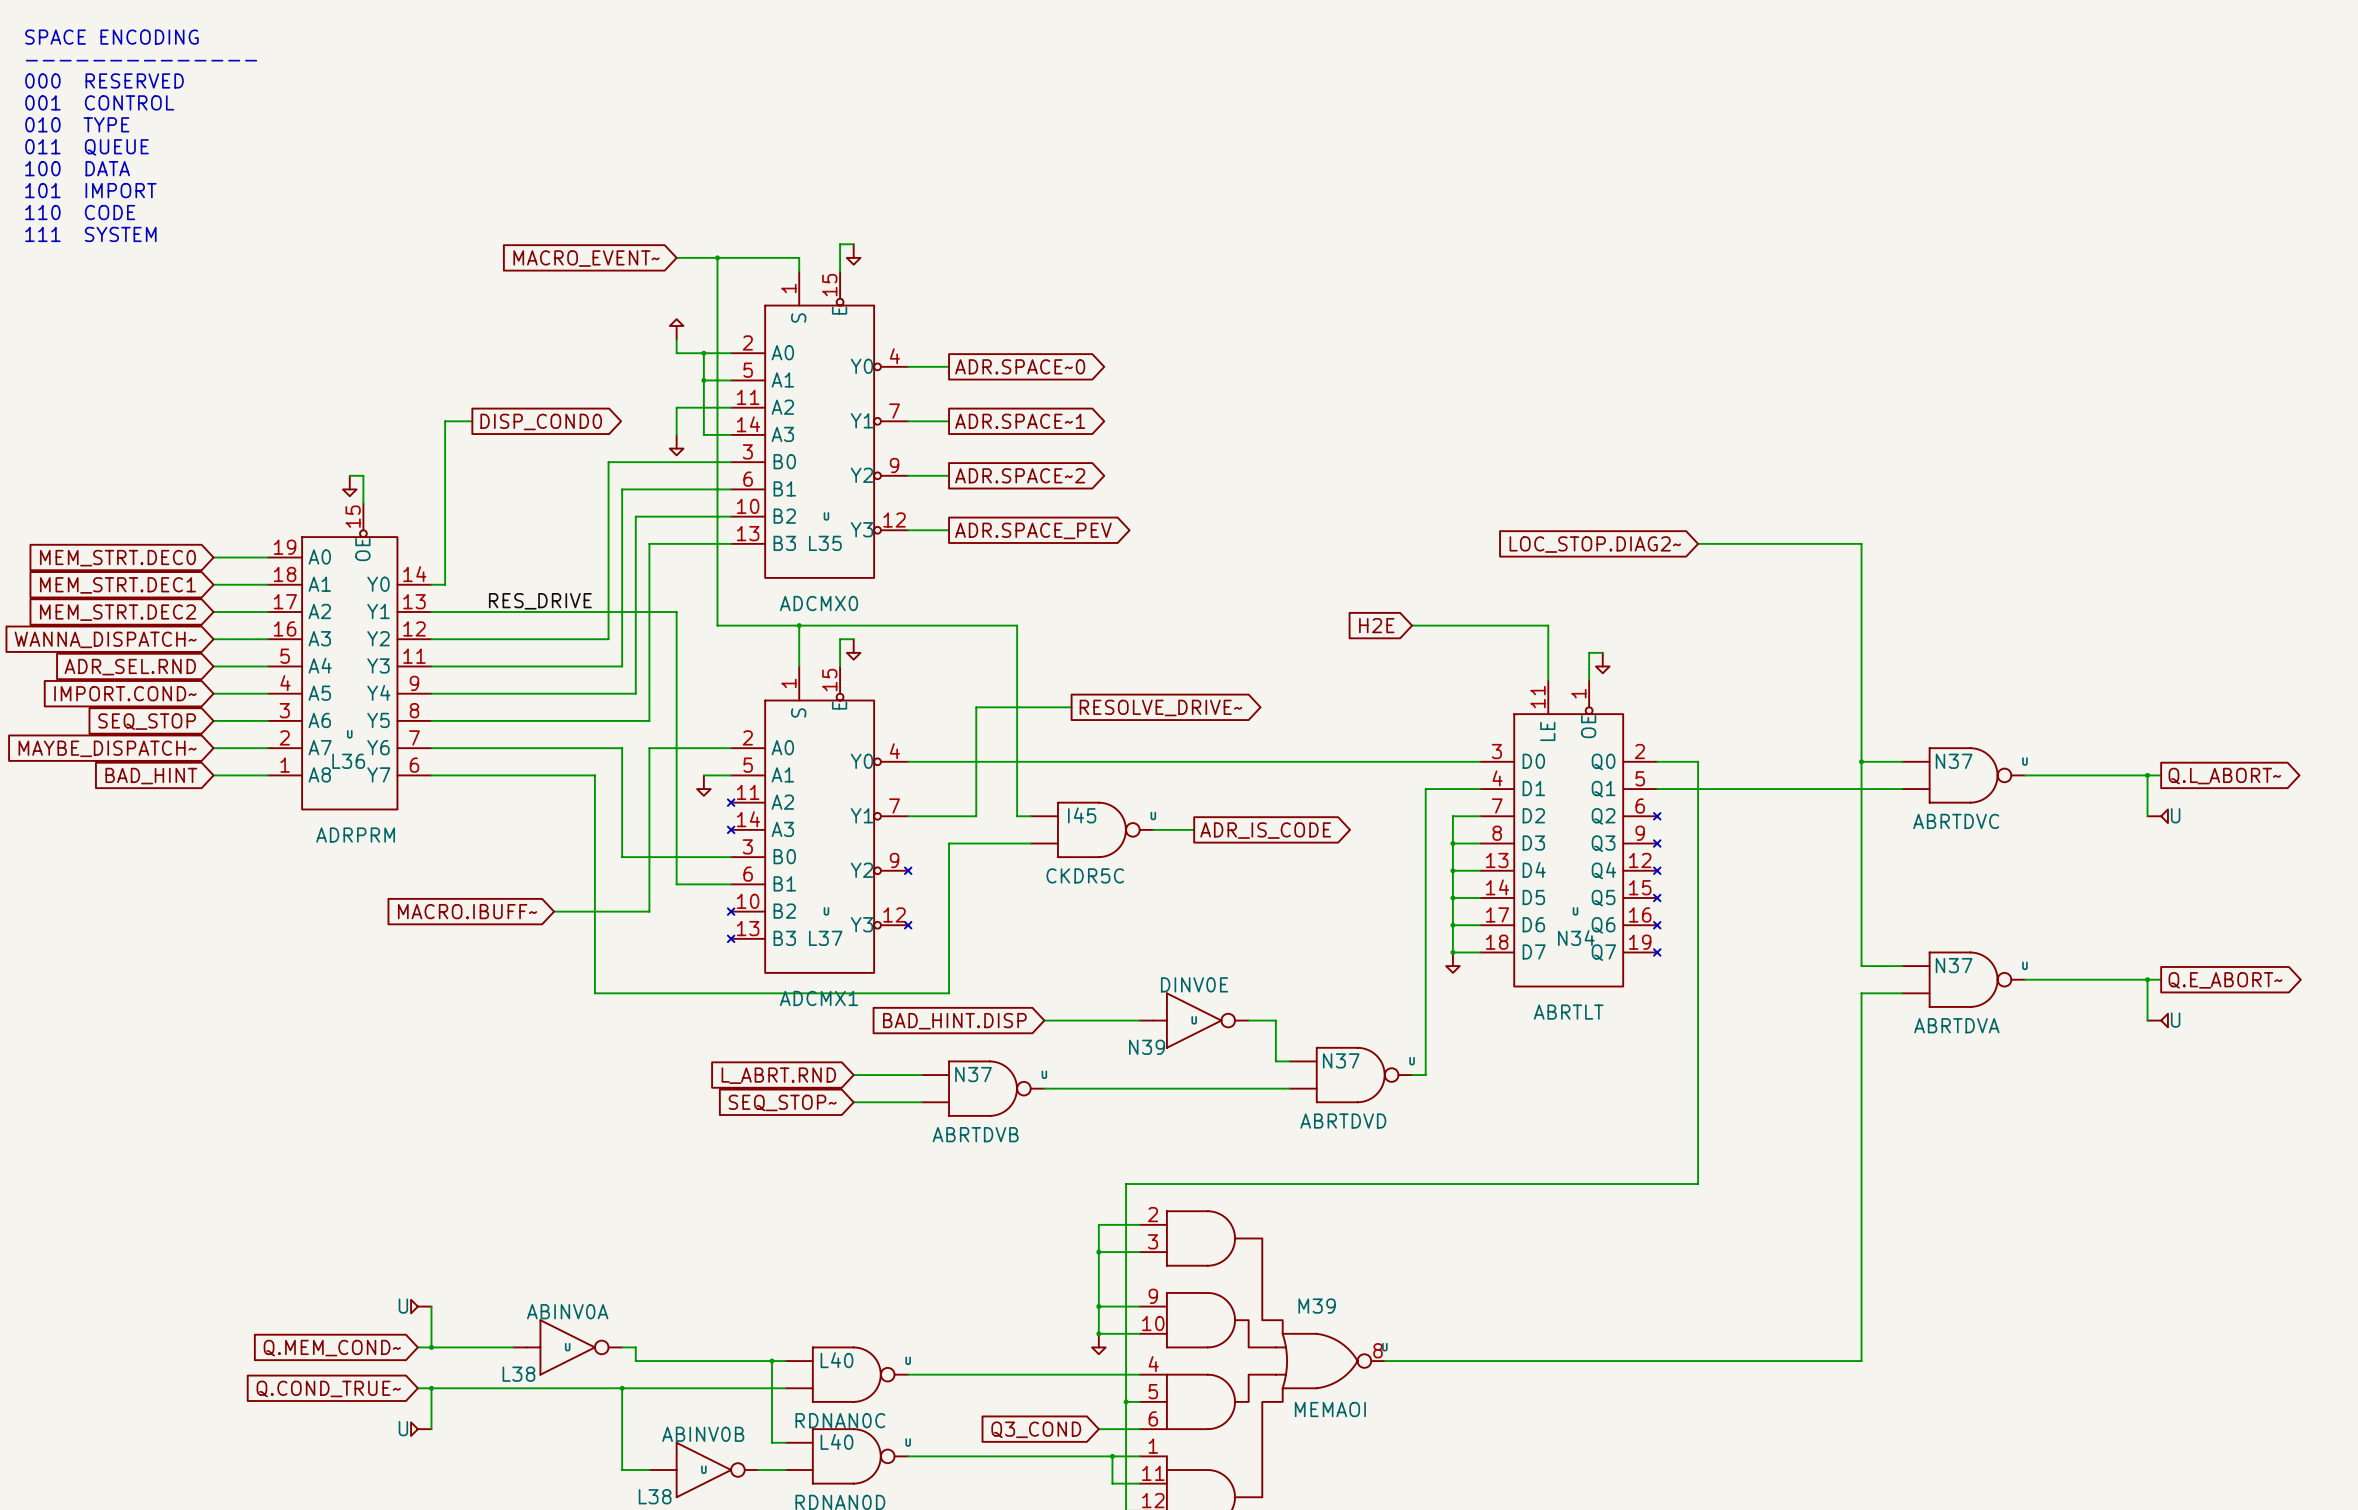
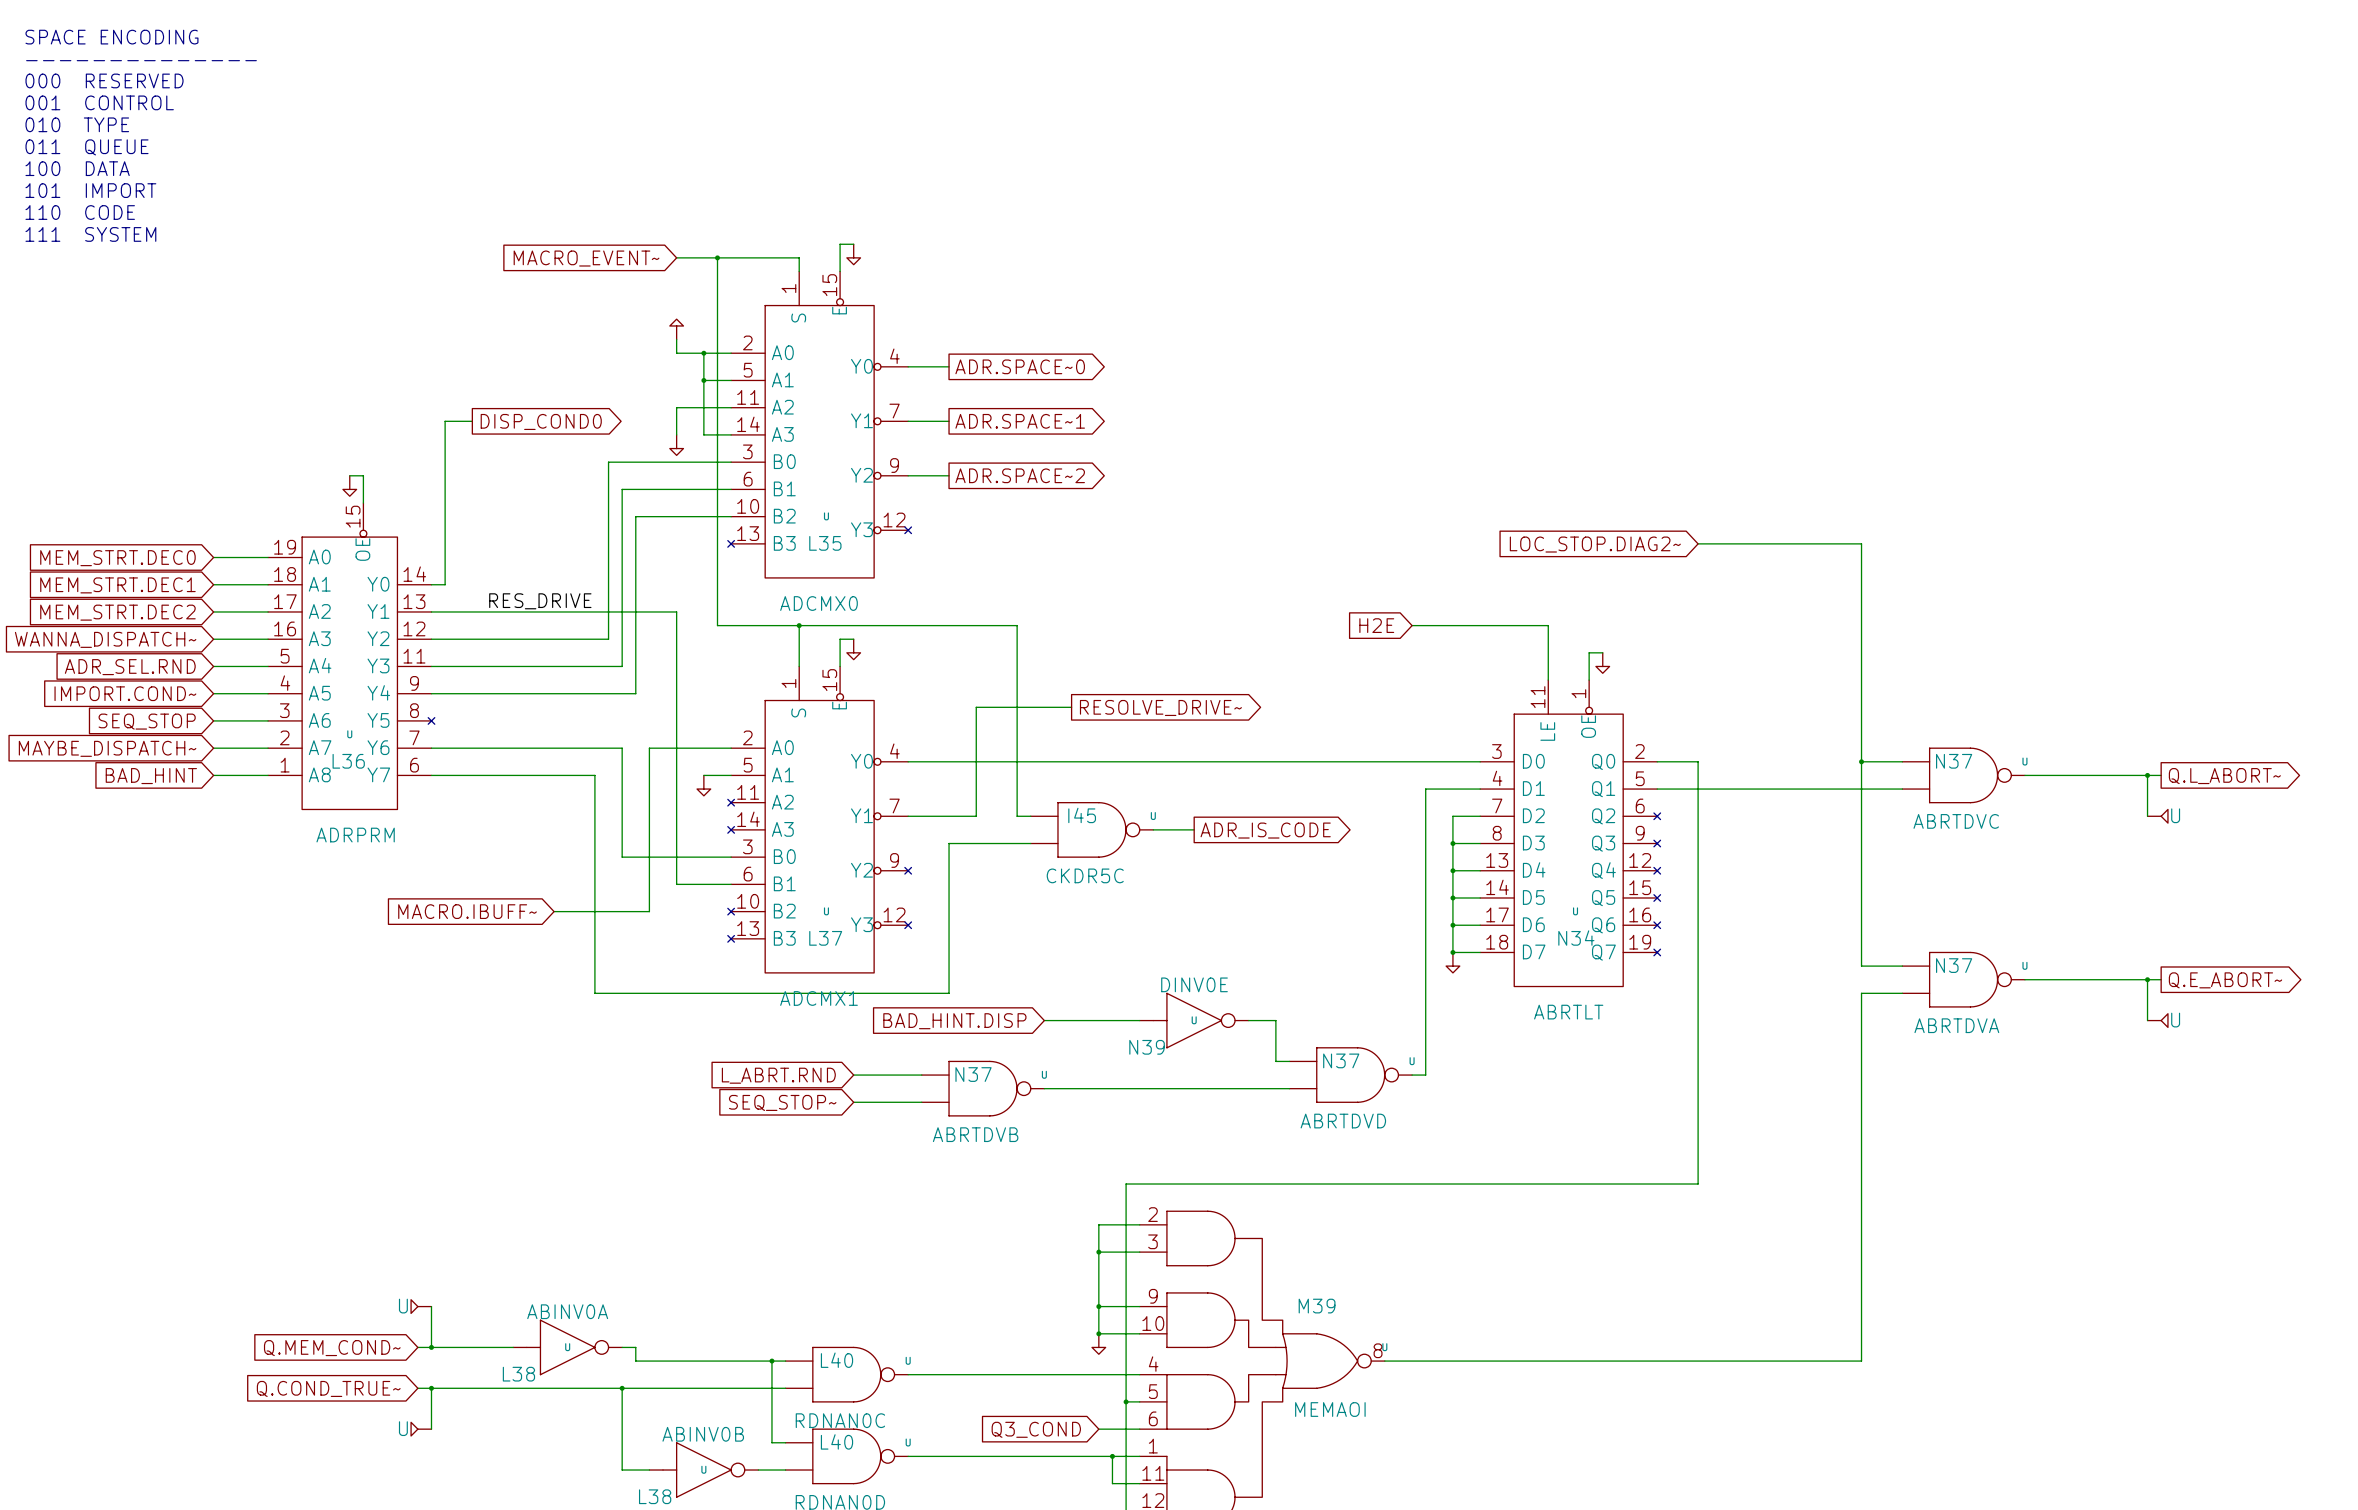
wire: (908, 530) (949, 530) -> none
no-connect mark: none -> (908, 530)
global label: ADR.SPACE_PEV (1033, 530) -> none
wire: (731, 543) (649, 543) (649, 720) (431, 720) -> none
no-connect mark: none -> (731, 543)
no-connect mark: none -> (431, 720)

